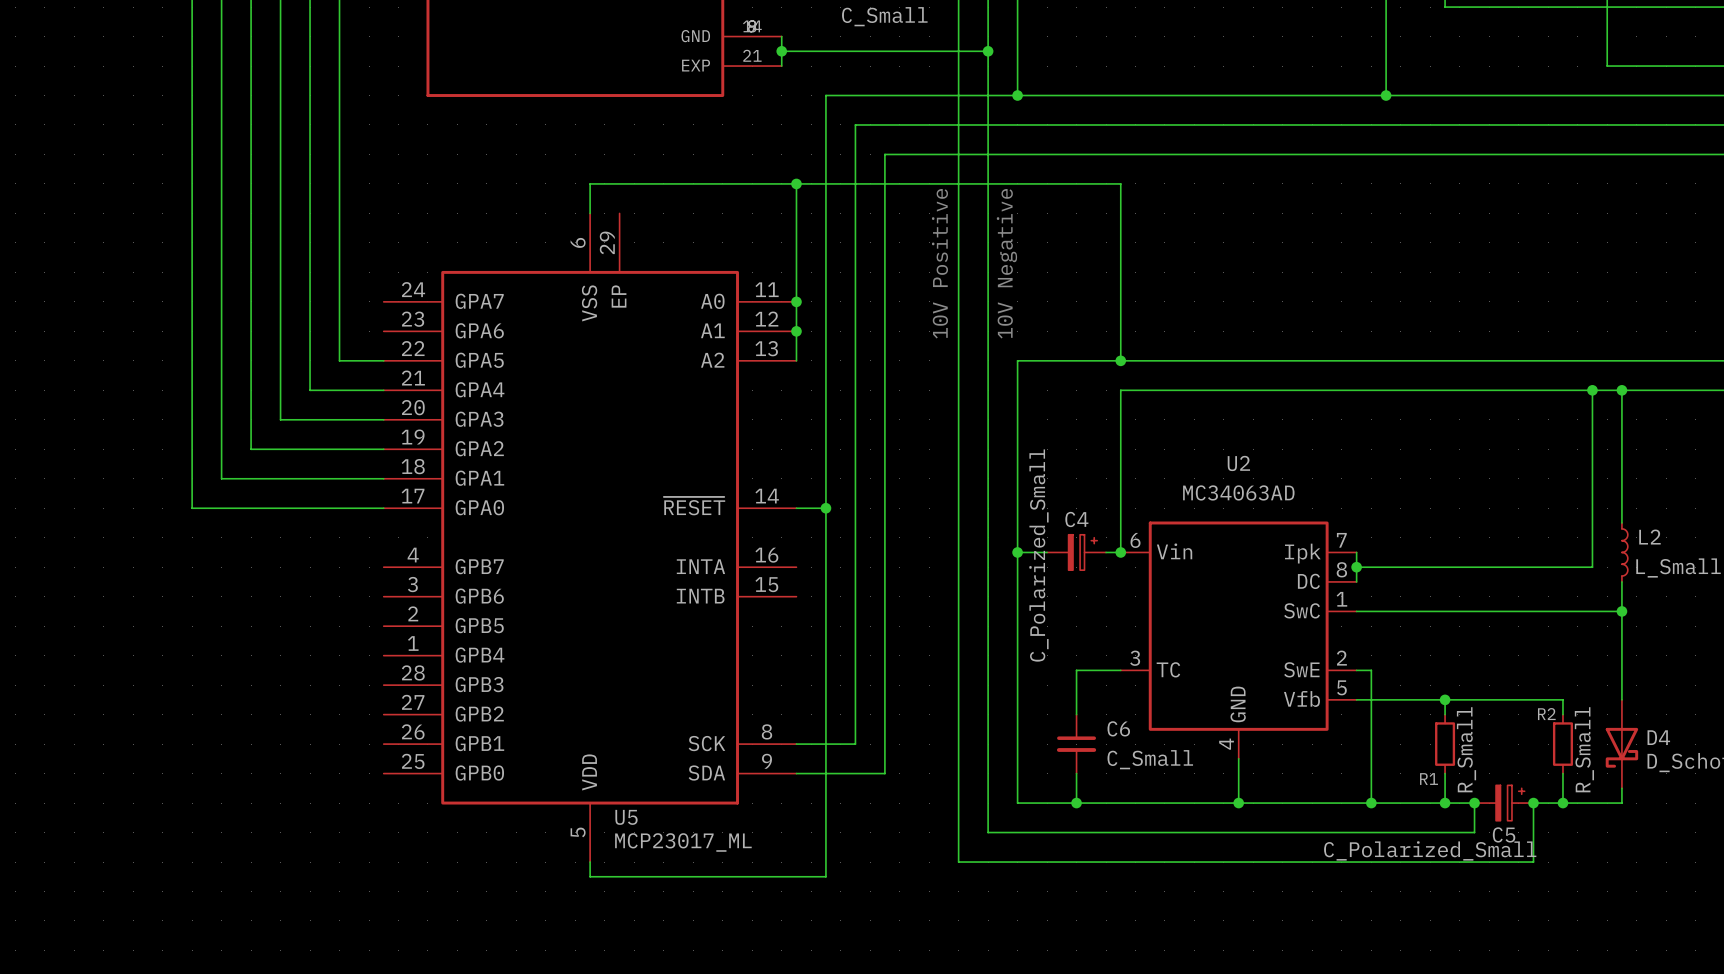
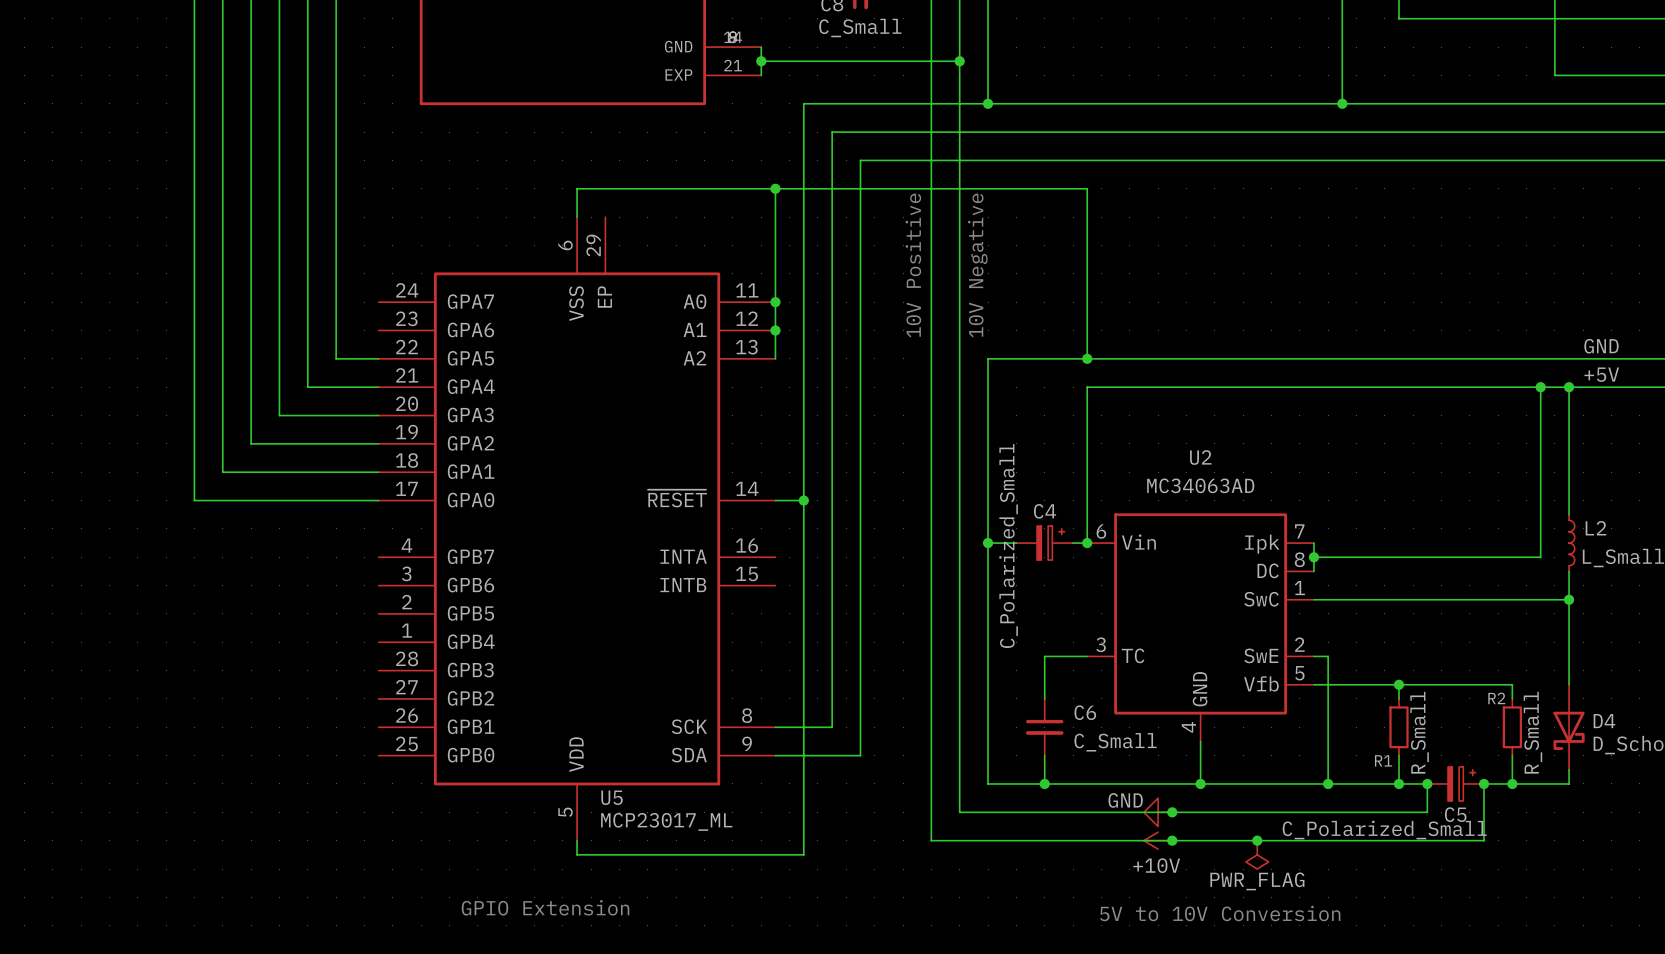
label: none -> GND (1601, 346)
label: none -> +5V (1601, 374)
power symbol: none -> GND (1158, 812)
junction: none -> (1172, 812)
power symbol: none -> +10V (1158, 840)
junction: none -> (1172, 840)
junction: none -> (1257, 840)
power symbol: none -> PWR_FLAG (1257, 854)
text: none -> GPIO Extension (545, 907)
text: none -> 5V to 10V Conversion (1220, 913)

